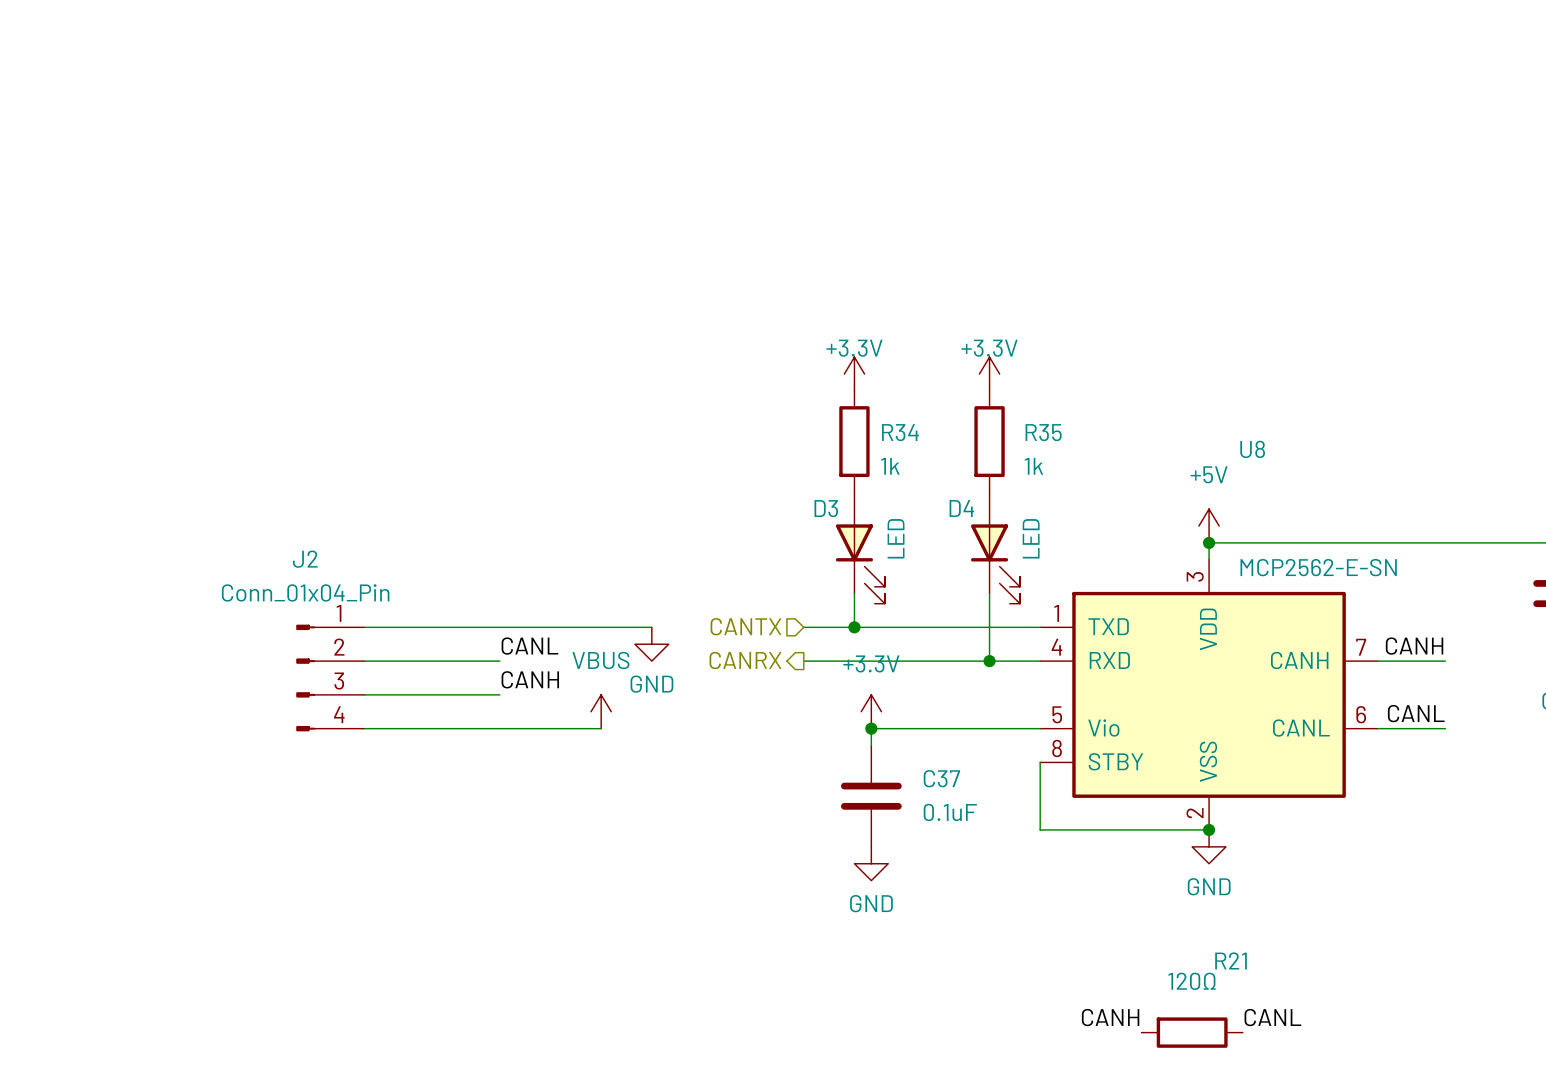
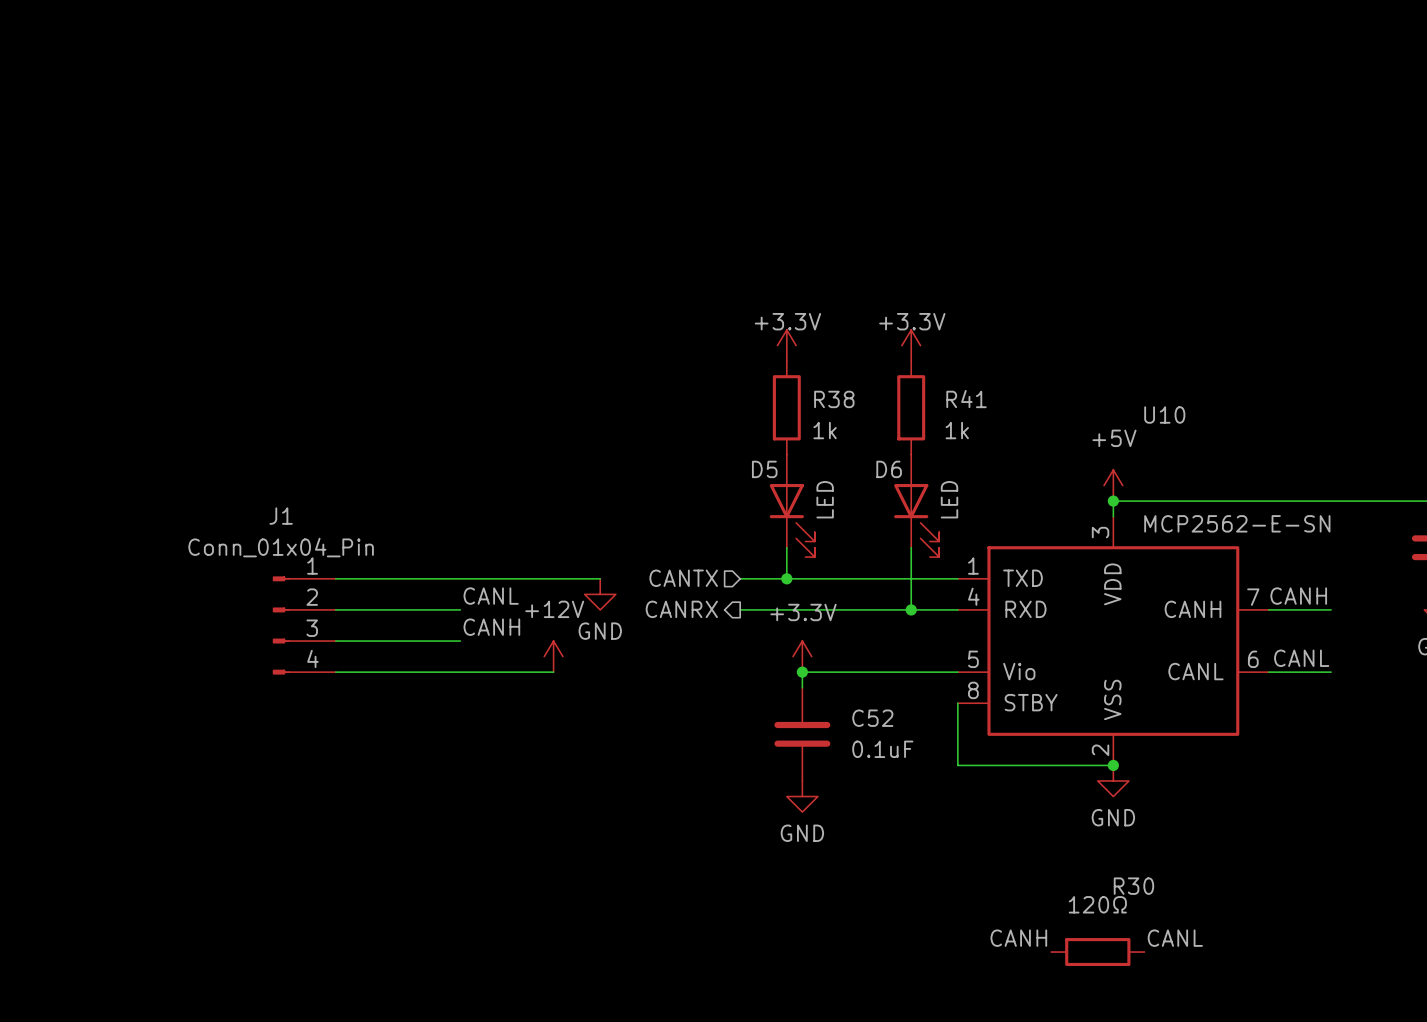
R34 name: R34 (900, 432) -> R38 (834, 399)
R35 name: R35 (1043, 432) -> R41 (966, 399)
U8 name: U8 (1252, 449) -> U10 (1164, 414)
D3 name: D3 (826, 508) -> D5 (764, 469)
D4 name: D4 (961, 508) -> D6 (889, 469)
J2 name: J2 (305, 559) -> J1 (281, 516)
power symbol: VBUS (601, 711) -> +12V (553, 656)
C37 name: C37 (941, 778) -> C52 (872, 718)
R21 name: R21 (1231, 960) -> R30 (1133, 886)

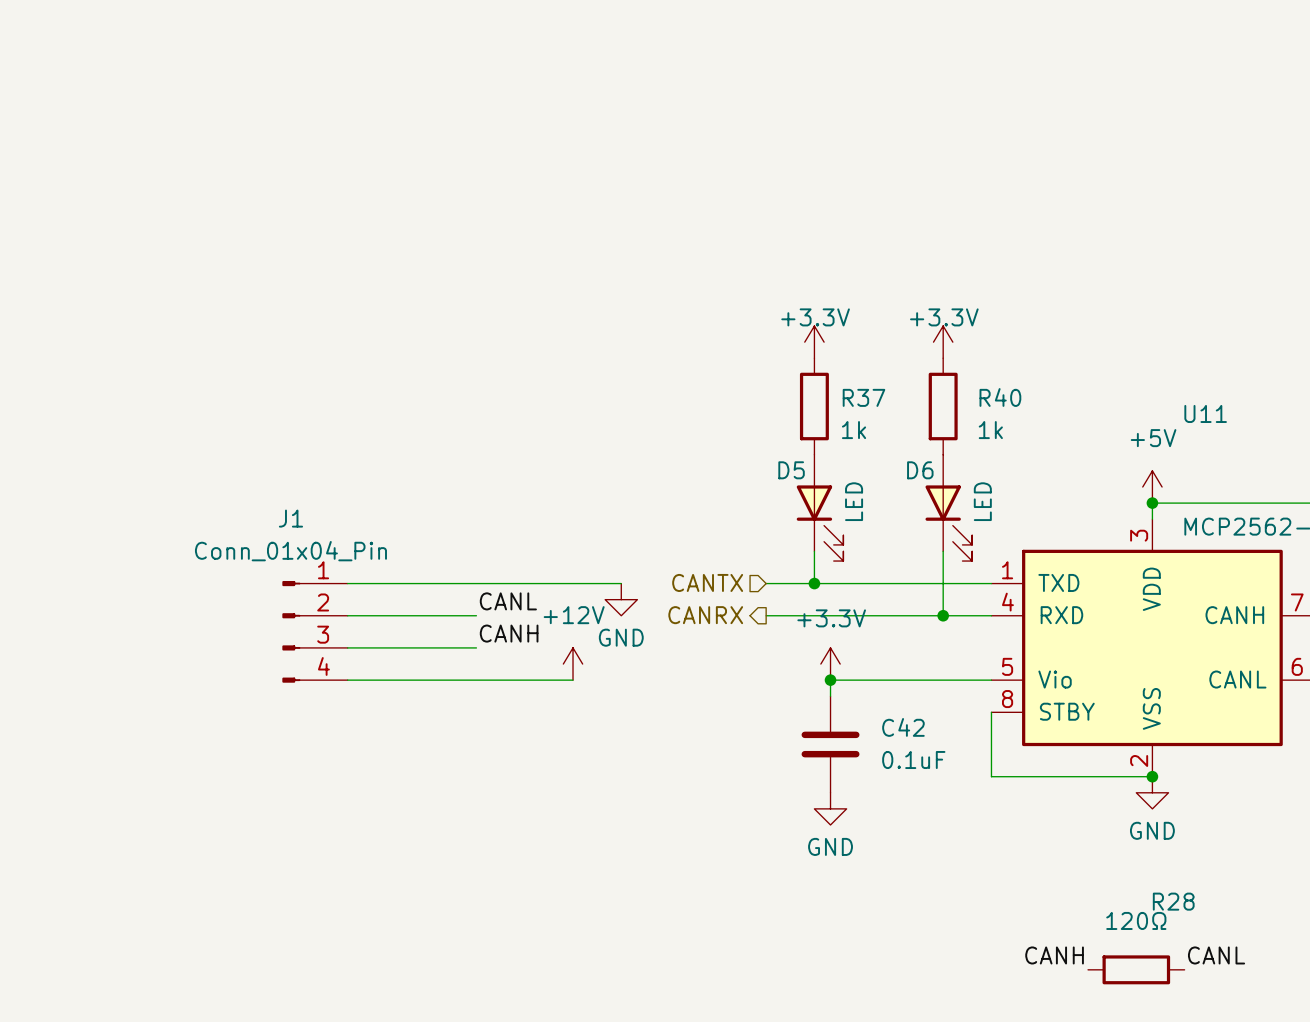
R38 name: R38 (834, 399) -> R37 (863, 397)
R41 name: R41 (966, 399) -> R40 (1000, 397)
U10 name: U10 (1164, 414) -> U11 (1205, 413)
C52 name: C52 (872, 718) -> C42 (903, 727)
R30 name: R30 (1133, 886) -> R28 (1173, 901)

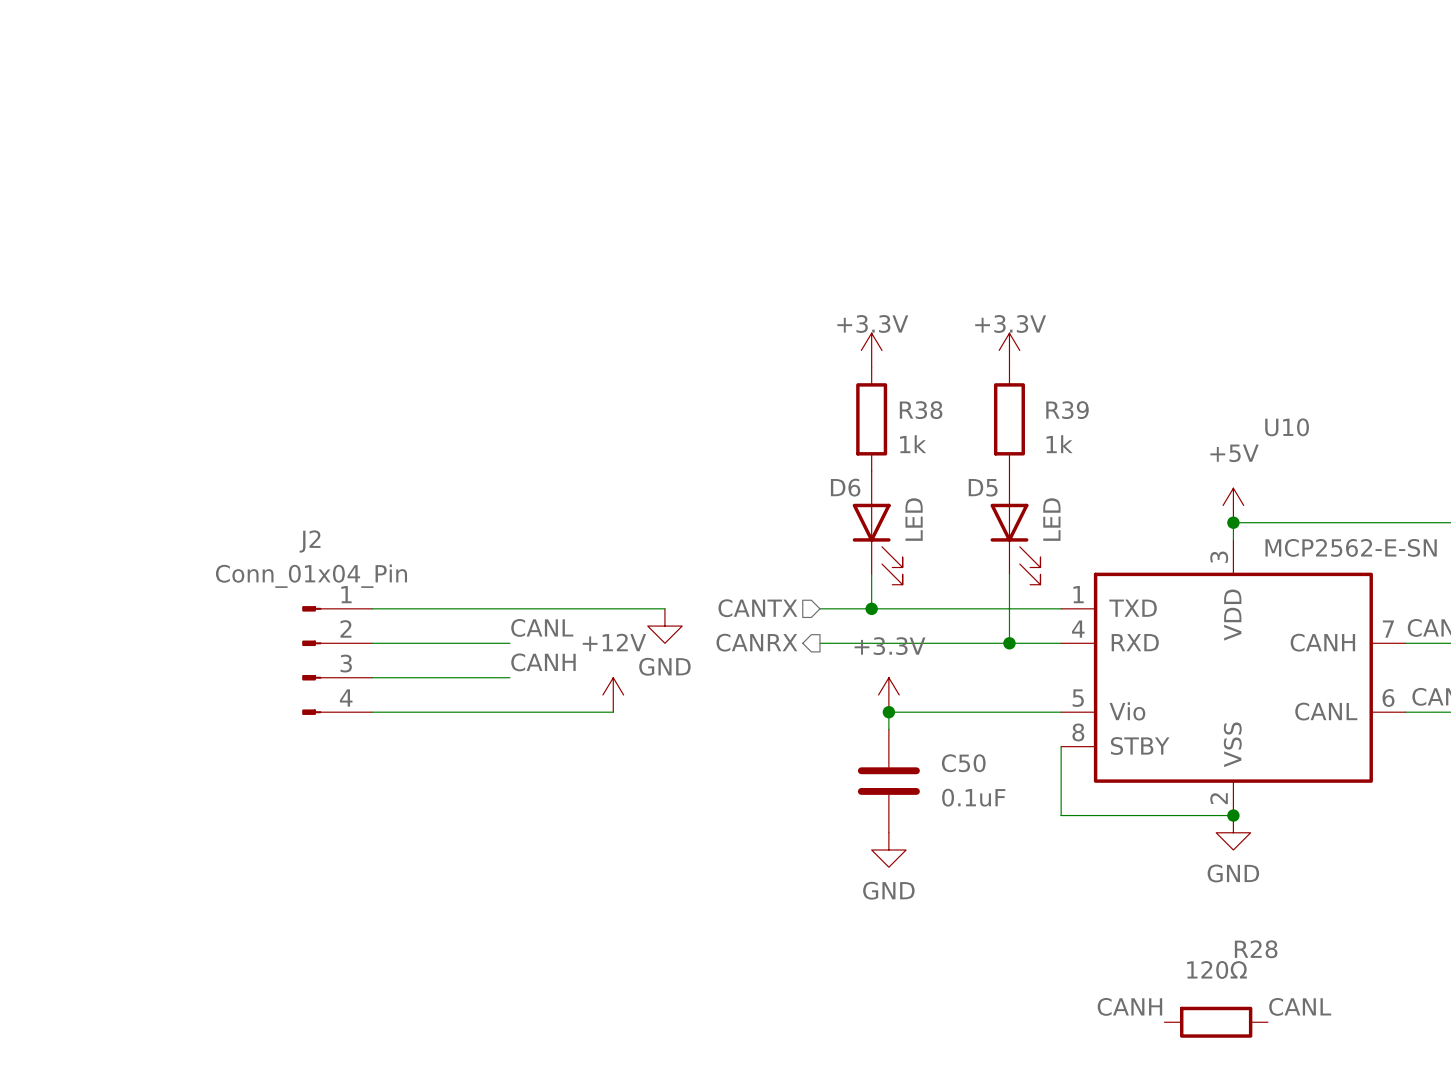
R37 name: R37 (863, 397) -> R38 (921, 410)
R40 name: R40 (1000, 397) -> R39 (1067, 410)
U11 name: U11 (1205, 413) -> U10 (1287, 427)
D5 name: D5 (791, 470) -> D6 (845, 487)
D6 name: D6 (920, 470) -> D5 (983, 487)
J1 name: J1 (290, 518) -> J2 (310, 541)
C42 name: C42 (903, 727) -> C50 (963, 763)

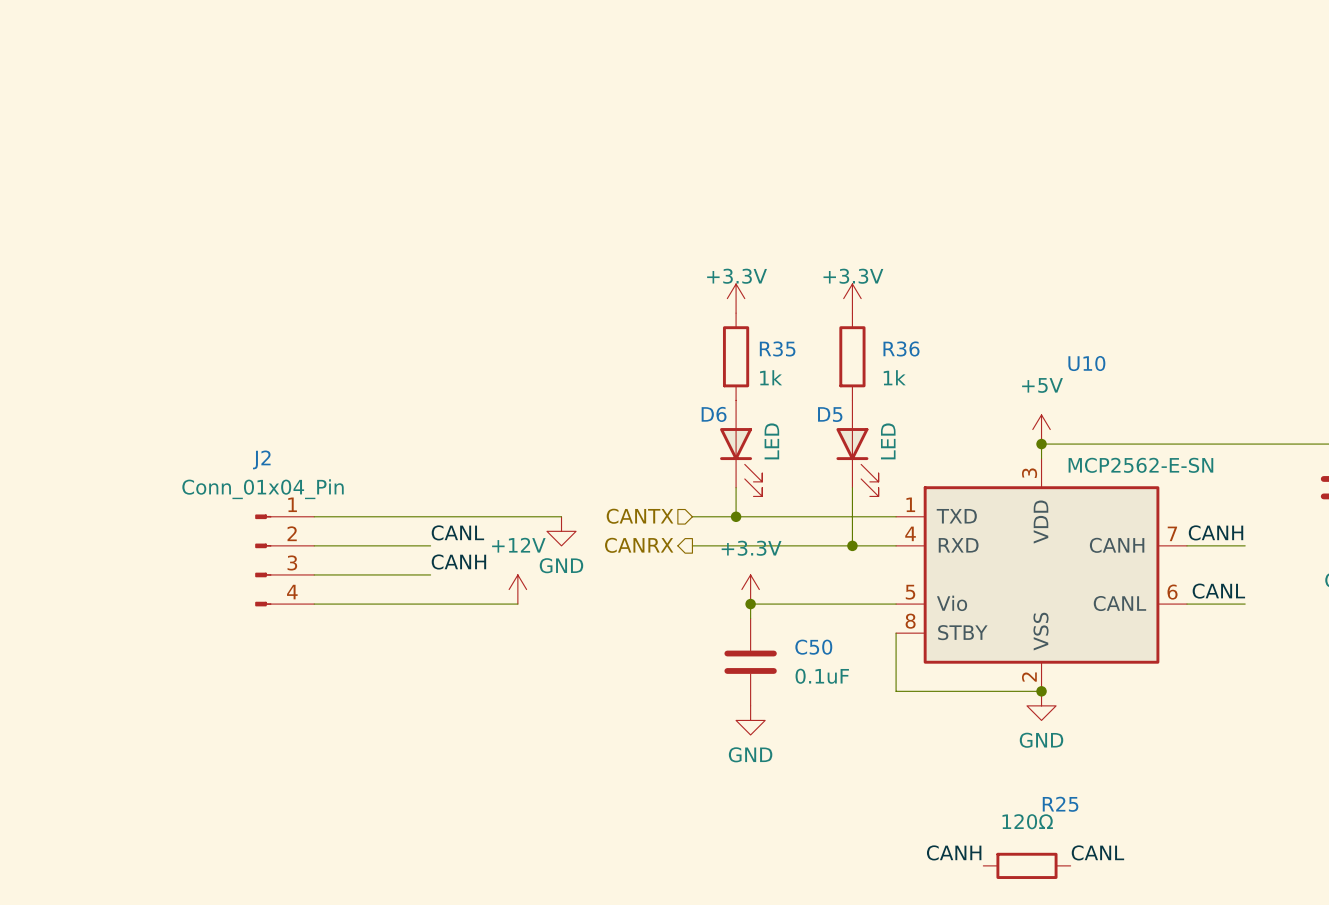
R38 name: R38 (921, 410) -> R35 (777, 348)
R39 name: R39 (1067, 410) -> R36 (901, 348)
R28 name: R28 (1256, 949) -> R25 (1060, 804)

